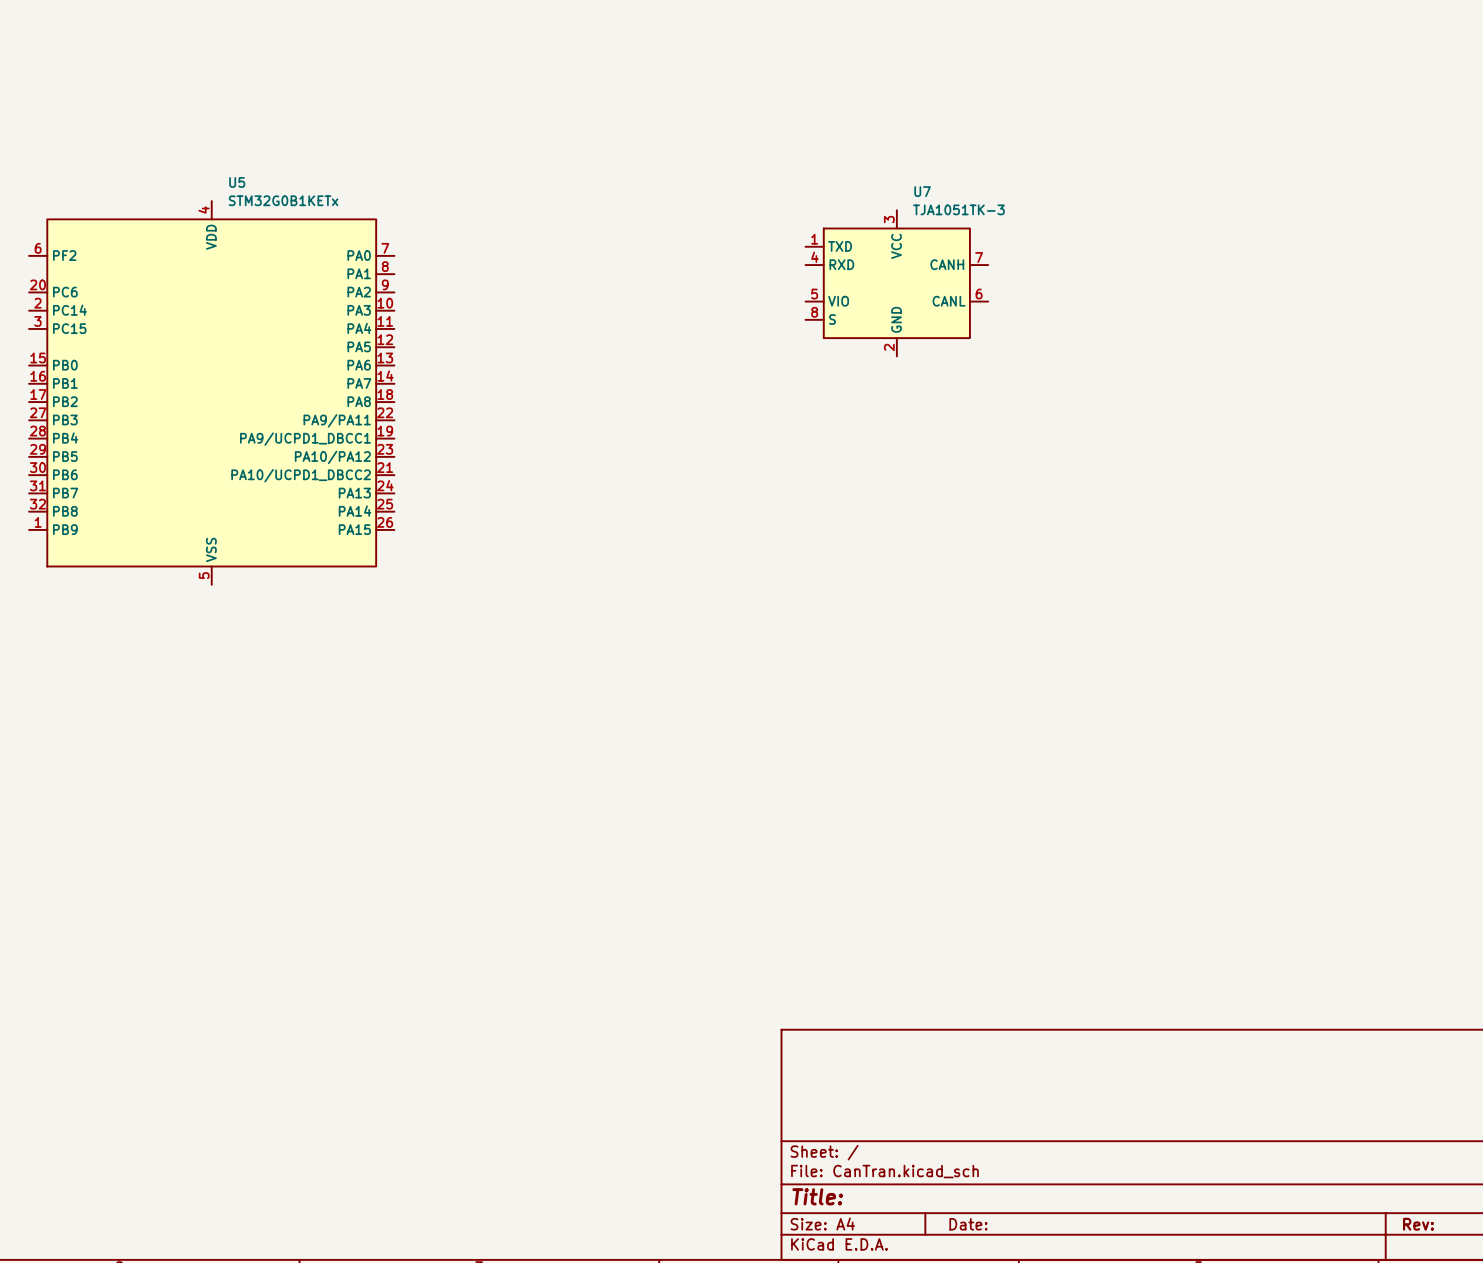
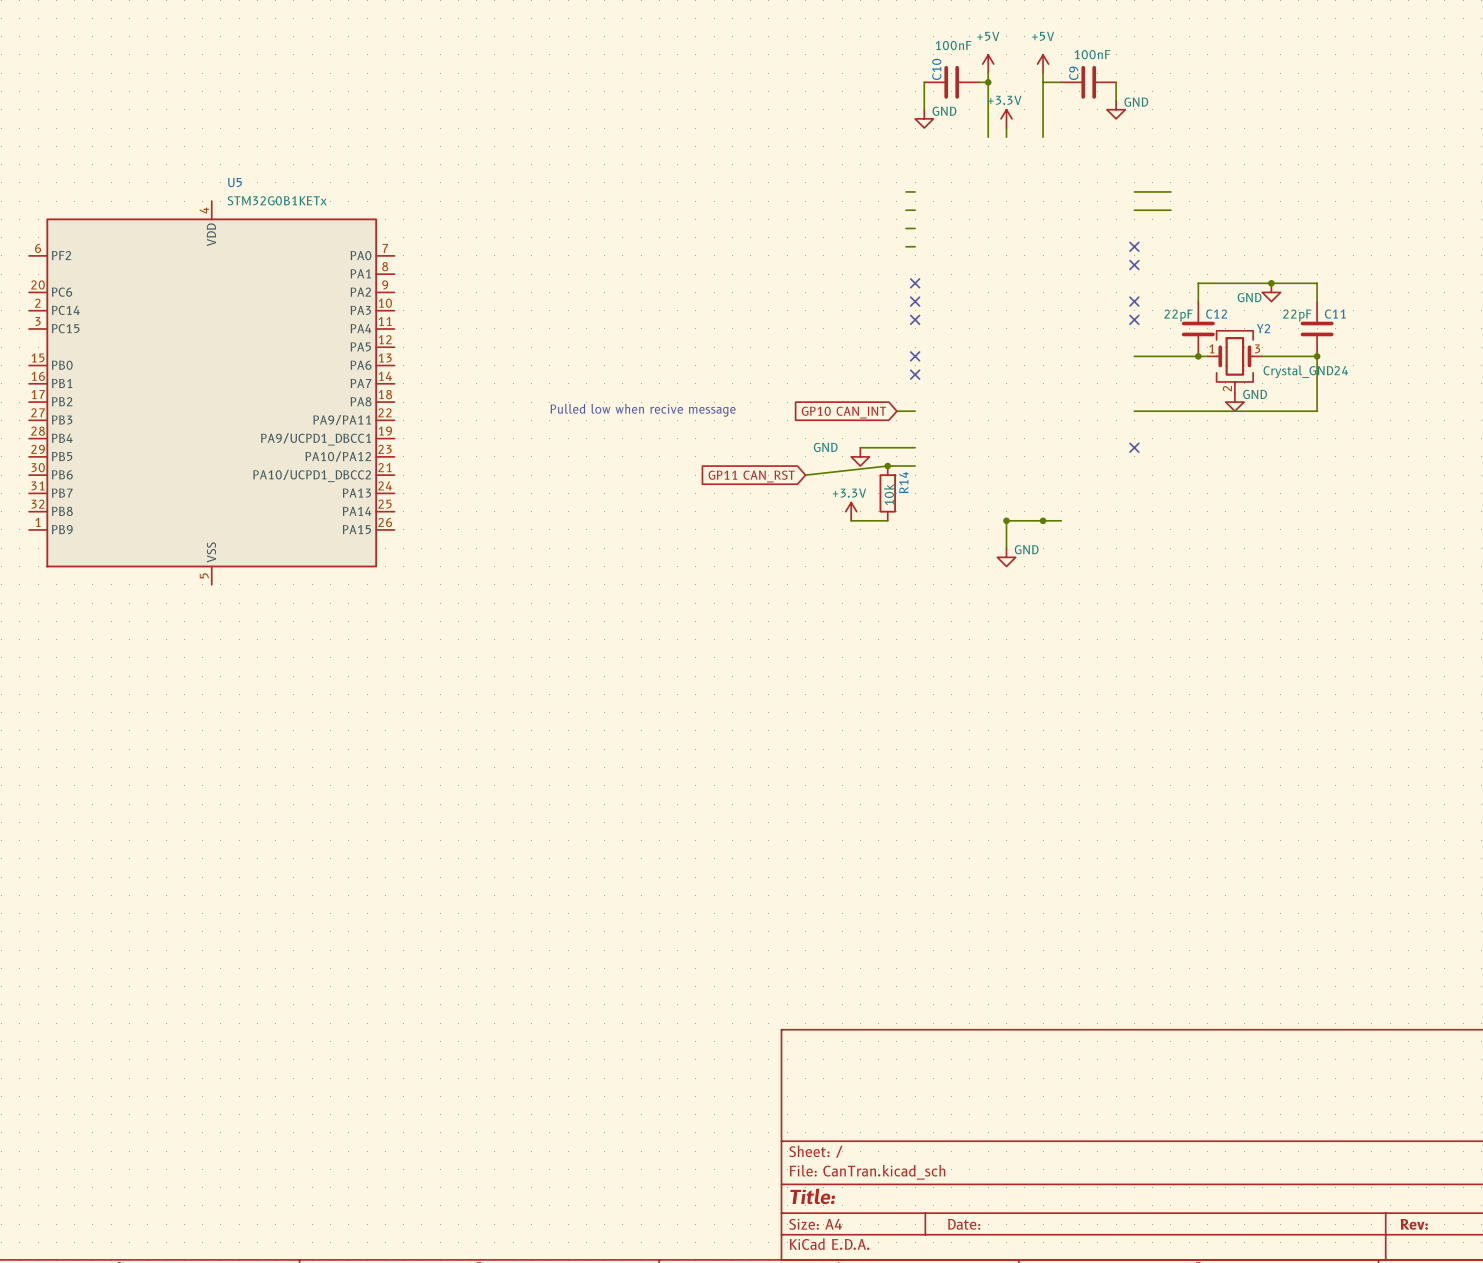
power symbol: none -> +5V (988, 64)
power symbol: none -> +5V (1043, 64)
wire: none -> (988, 73) (988, 137)
wire: none -> (1043, 73) (1043, 137)
wire: none -> (924, 82) (924, 109)
C10: none -> 100nF (951, 82)
wire: none -> (979, 82) (988, 82)
junction: none -> (988, 82)
wire: none -> (1043, 82) (1061, 82)
C9: none -> 100nF (1088, 82)
wire: none -> (1116, 82) (1116, 100)
power symbol: none -> GND (1116, 109)
power symbol: none -> GND (924, 118)
power symbol: none -> +3.3V (1006, 118)
wire: none -> (1006, 128) (1006, 137)
wire: none -> (906, 191) (915, 191)
wire: none -> (1134, 191) (1170, 191)
wire: none -> (906, 210) (915, 210)
wire: none -> (1134, 210) (1170, 210)
no-connect mark: none -> (1134, 246)
no-connect mark: none -> (1134, 265)
U7: TJA1051TK-3 (896, 283) -> none
no-connect mark: none -> (915, 283)
junction: none -> (1271, 283)
power symbol: none -> GND (1271, 292)
no-connect mark: none -> (915, 301)
no-connect mark: none -> (1134, 301)
wire: none -> (1198, 301) (1198, 283) (1317, 283) (1317, 301)
no-connect mark: none -> (915, 319)
no-connect mark: none -> (1134, 319)
C12: none -> 22pF (1198, 328)
C11: none -> 22pF (1317, 328)
no-connect mark: none -> (915, 356)
wire: none -> (1134, 356) (1207, 356)
junction: none -> (1198, 356)
wire: none -> (1262, 356) (1317, 356) (1317, 411) (1134, 411)
junction: none -> (1317, 356)
Y2: none -> Crystal_GND24 (1234, 361)
no-connect mark: none -> (915, 374)
power symbol: none -> GND (1234, 402)
text: none -> Pulled low when recive message (643, 410)
global label: none -> GP10 CAN_INT (843, 412)
wire: none -> (896, 411) (915, 411)
wire: none -> (860, 447) (915, 447)
no-connect mark: none -> (1134, 447)
power symbol: none -> GND (860, 456)
junction: none -> (887, 466)
wire: none -> (915, 466) (887, 466) (805, 475)
global label: none -> GP11 CAN_RST (751, 476)
R14: none -> 10k (887, 493)
power symbol: none -> +3.3V (851, 511)
wire: none -> (851, 520) (887, 520)
junction: none -> (1006, 520)
junction: none -> (1043, 520)
wire: none -> (1061, 520) (1006, 520) (1006, 548)
power symbol: none -> GND (1006, 557)

